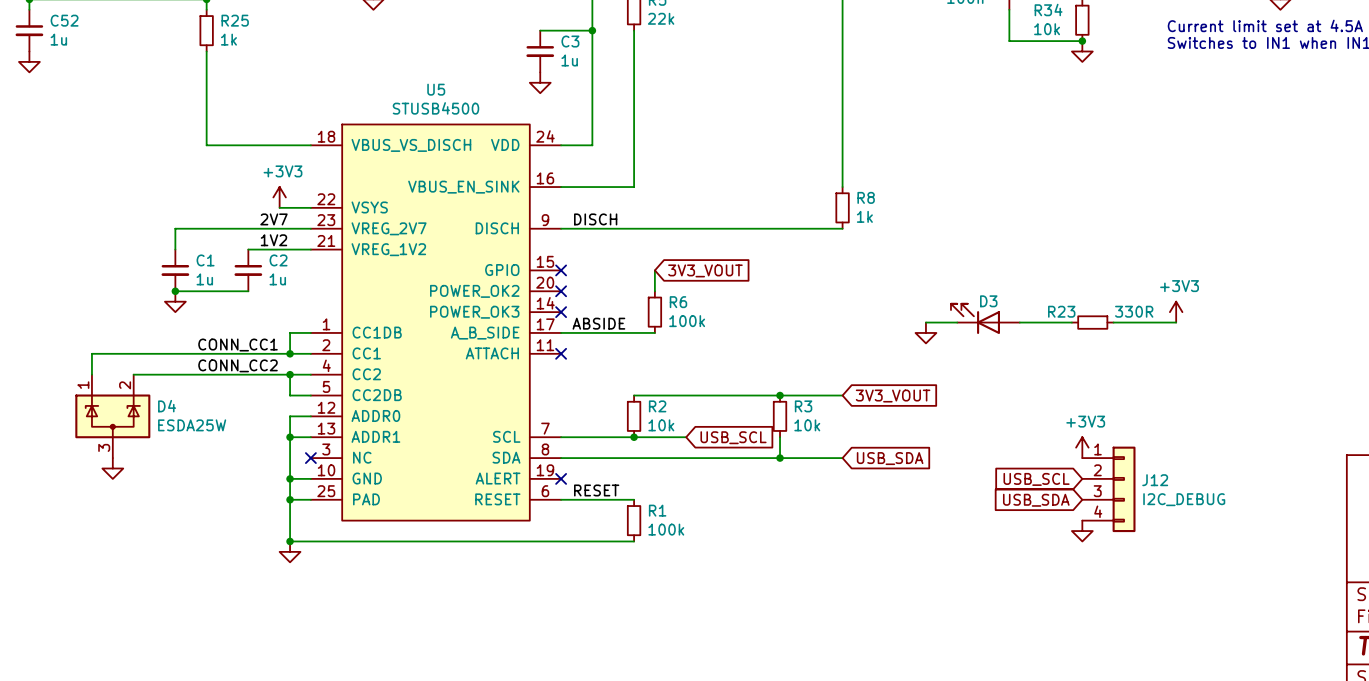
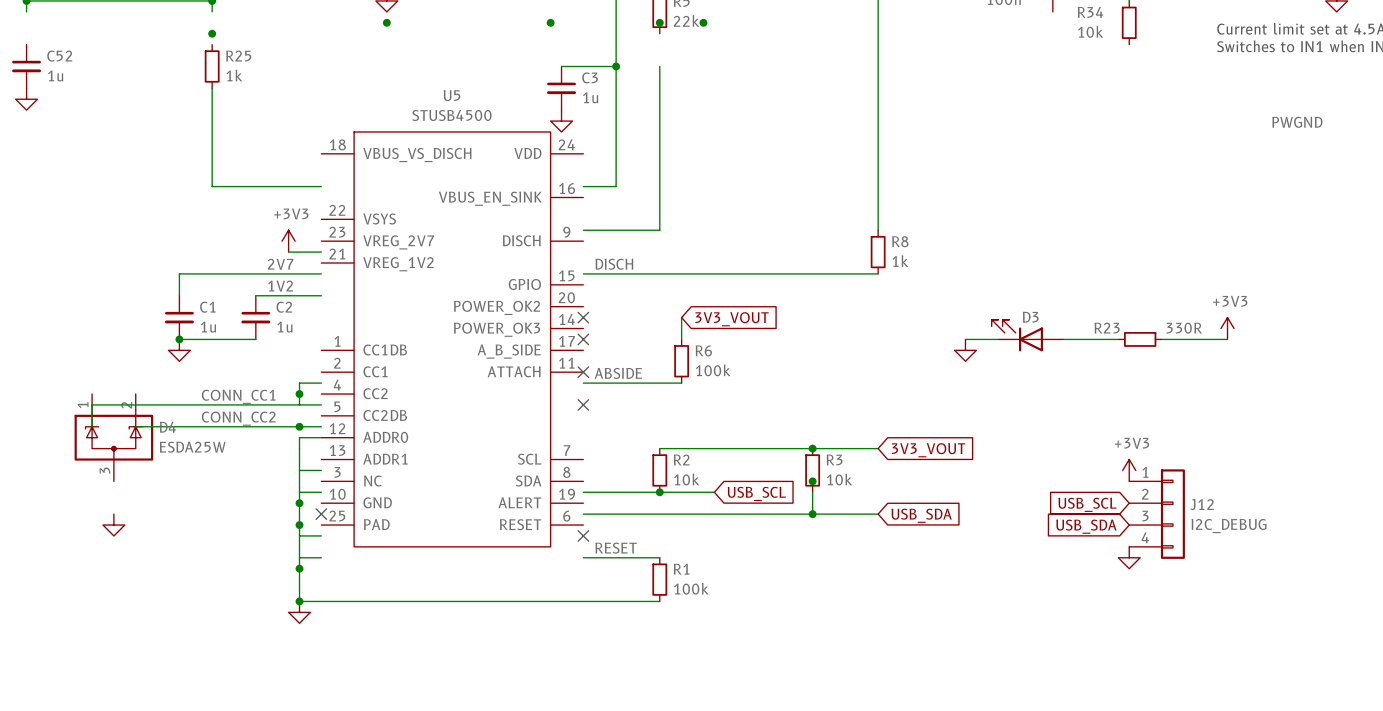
wire: (1009, 9) (1009, 41) (1082, 41) -> none
junction: none -> (386, 22)
junction: none -> (550, 22)
junction: none -> (659, 22)
junction: none -> (703, 22)
C52 position: (29, 30) -> (26, 66)
junction: none -> (212, 33)
R25 position: (206, 30) -> (212, 66)
wire: (540, 30) (592, 30) -> (561, 66) (616, 66)
junction: (592, 30) -> none
wire: (634, 30) (634, 61) -> none
junction: (1082, 41) -> none
wire: (206, 51) (206, 82) -> none
C3 position: (540, 51) -> (561, 88)
power symbol: (1082, 51) -> none
power symbol position: (29, 61) -> (26, 99)
junction: none -> (616, 66)
power symbol position: (540, 82) -> (561, 121)
label: none -> PWGND (1297, 122)
wire: (206, 145) (310, 145) -> (212, 153) (212, 186) (321, 186)
wire: (561, 145) (592, 145) -> (583, 186) (616, 186) (616, 153)
wire: (561, 187) (634, 187) -> (583, 230) (659, 230) (659, 197)
wire: none -> (878, 197) (878, 230)
power symbol position: +3V3 (279, 197) -> +3V3 (288, 241)
wire: (279, 207) (310, 207) -> (288, 252) (321, 252)
R8 position: (842, 207) -> (878, 252)
label position: 2V7 (273, 219) -> 2V7 (280, 264)
label position: DISCH (595, 219) -> DISCH (614, 264)
wire: (310, 228) (175, 228) (175, 249) -> (321, 273) (179, 273) (179, 295)
wire: (561, 228) (842, 228) -> (583, 273) (878, 273)
label position: 1V2 (273, 240) -> 1V2 (280, 286)
wire: (248, 249) (310, 249) -> (255, 295) (321, 295)
C1 position: (175, 270) -> (179, 317)
C2 position: (248, 270) -> (255, 317)
no-connect mark: (561, 270) -> none
wire: (654, 270) (654, 291) -> (681, 317) (681, 339)
global label position: 3V3_VOUT (705, 270) -> 3V3_VOUT (732, 319)
wire: (175, 291) (248, 291) -> (179, 339) (255, 339)
junction position: (175, 291) -> (179, 339)
no-connect mark: (561, 291) -> none
power symbol position: (175, 301) -> (179, 350)
no-connect mark: none -> (583, 317)
no-connect mark: (561, 312) -> none
R6 position: (654, 312) -> (681, 361)
no-connect mark: none -> (583, 339)
label position: ABSIDE (598, 323) -> ABSIDE (618, 373)
wire: (310, 332) (290, 332) (290, 353) -> none
wire: (561, 332) (654, 332) -> (583, 383) (681, 383)
label position: CONN_CC1 (238, 345) -> CONN_CC1 (238, 396)
junction: (290, 353) -> none
wire: (310, 353) (91, 353) (91, 374) -> (321, 404) (92, 404) (92, 426)
wire: none -> (321, 383) (299, 383) (299, 394)
label position: CONN_CC2 (238, 365) -> CONN_CC2 (238, 418)
wire: (133, 374) (310, 374) -> (135, 426) (321, 426)
wire: (290, 385) (290, 395) (310, 395) -> none
no-connect mark: none -> (583, 404)
wire: (634, 395) (842, 395) -> (659, 448) (878, 448)
junction position: (780, 395) -> (812, 448)
global label position: 3V3_VOUT (893, 396) -> 3V3_VOUT (928, 450)
junction: none -> (299, 426)
R2 position: (634, 416) -> (659, 470)
R3 position: (780, 416) -> (812, 470)
wire: (290, 437) (310, 437) -> (299, 492) (321, 492)
junction: (290, 437) -> none
wire: (561, 437) (686, 437) -> (583, 492) (714, 492)
junction position: (634, 437) -> (659, 492)
global label position: USB_SCL (733, 437) -> USB_SCL (756, 493)
wire: (780, 437) (780, 458) -> (812, 492) (812, 514)
wire: none -> (299, 470) (321, 470)
no-connect mark position: (310, 458) -> (321, 514)
wire: (561, 458) (842, 458) -> (583, 514) (878, 514)
global label position: USB_SDA (890, 458) -> USB_SDA (921, 515)
power symbol position: (112, 468) -> (113, 525)
wire: (290, 478) (310, 478) -> (299, 535) (321, 535)
no-connect mark position: (561, 478) -> (583, 535)
junction: none -> (812, 514)
label position: RESET (596, 490) -> RESET (616, 548)
wire: (290, 499) (310, 499) -> (299, 557) (321, 557)
wire: (561, 499) (634, 499) -> (583, 557) (659, 557)
R1 position: (634, 520) -> (659, 579)
wire: (290, 541) (634, 541) -> (299, 568) (299, 601) (659, 601)
power symbol position: (290, 551) -> (299, 612)
junction: none -> (299, 601)

